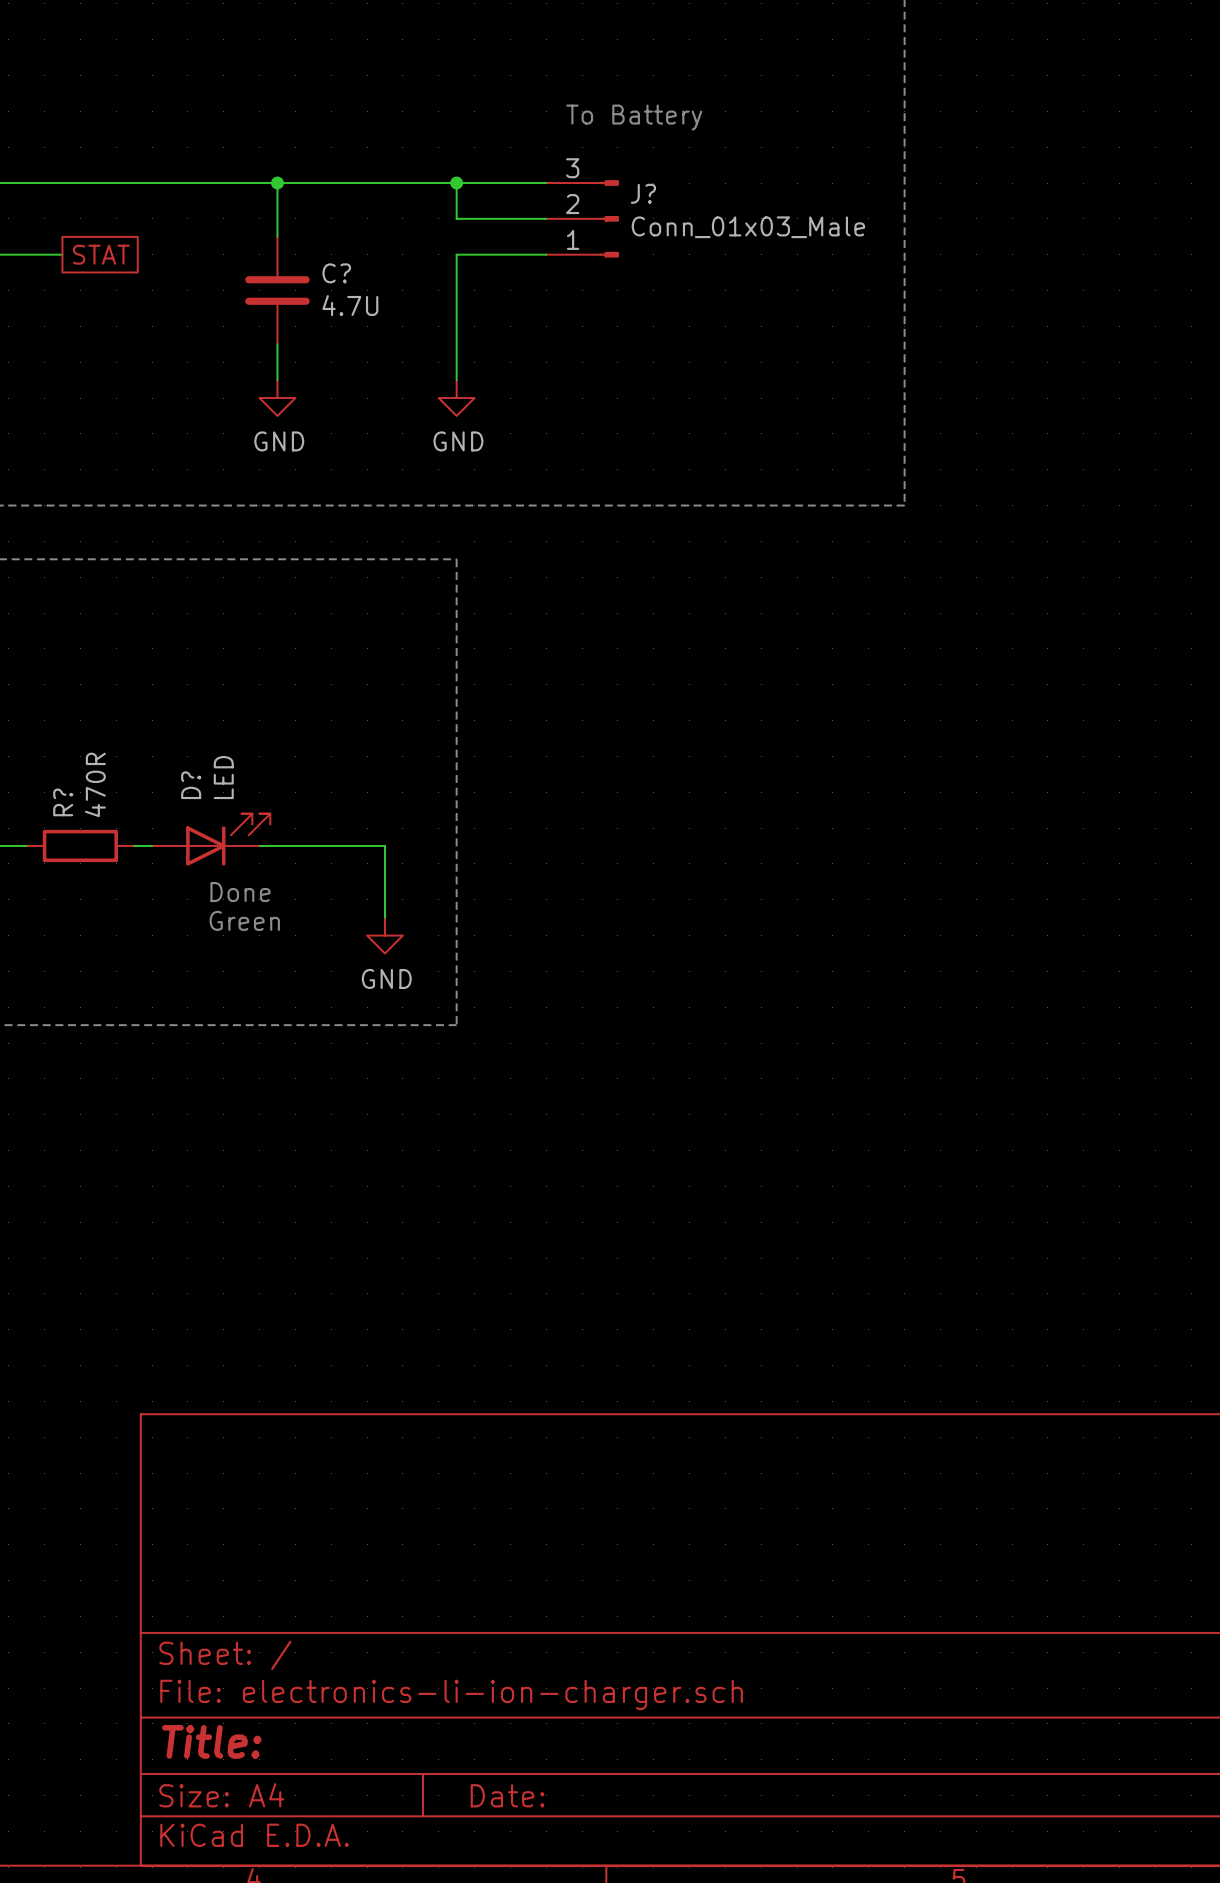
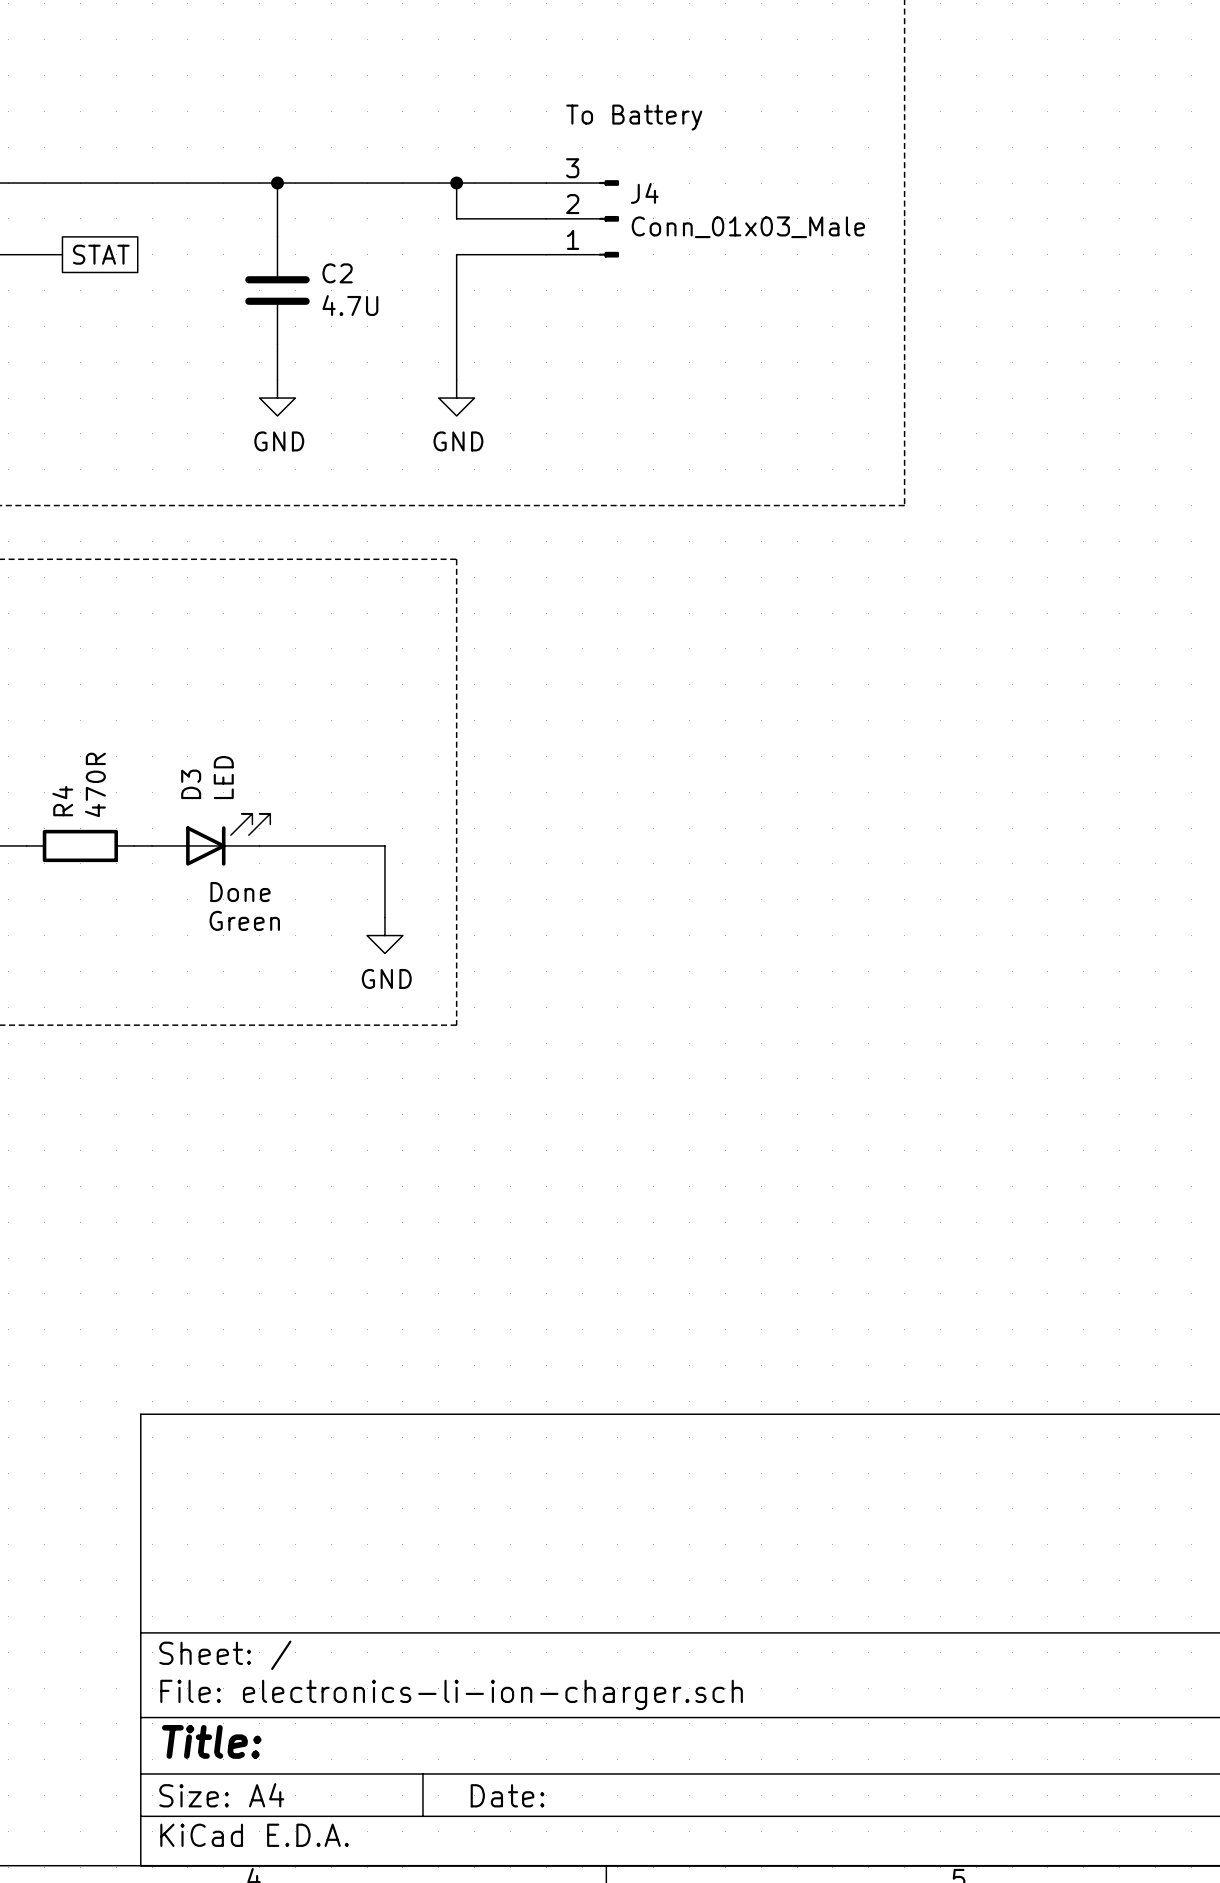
J? name: J? (643, 193) -> J4 (644, 193)
C? name: C? (336, 273) -> C2 (337, 273)
D? name: D? (191, 785) -> D3 (191, 784)
R? name: R? (63, 802) -> R4 (62, 801)

